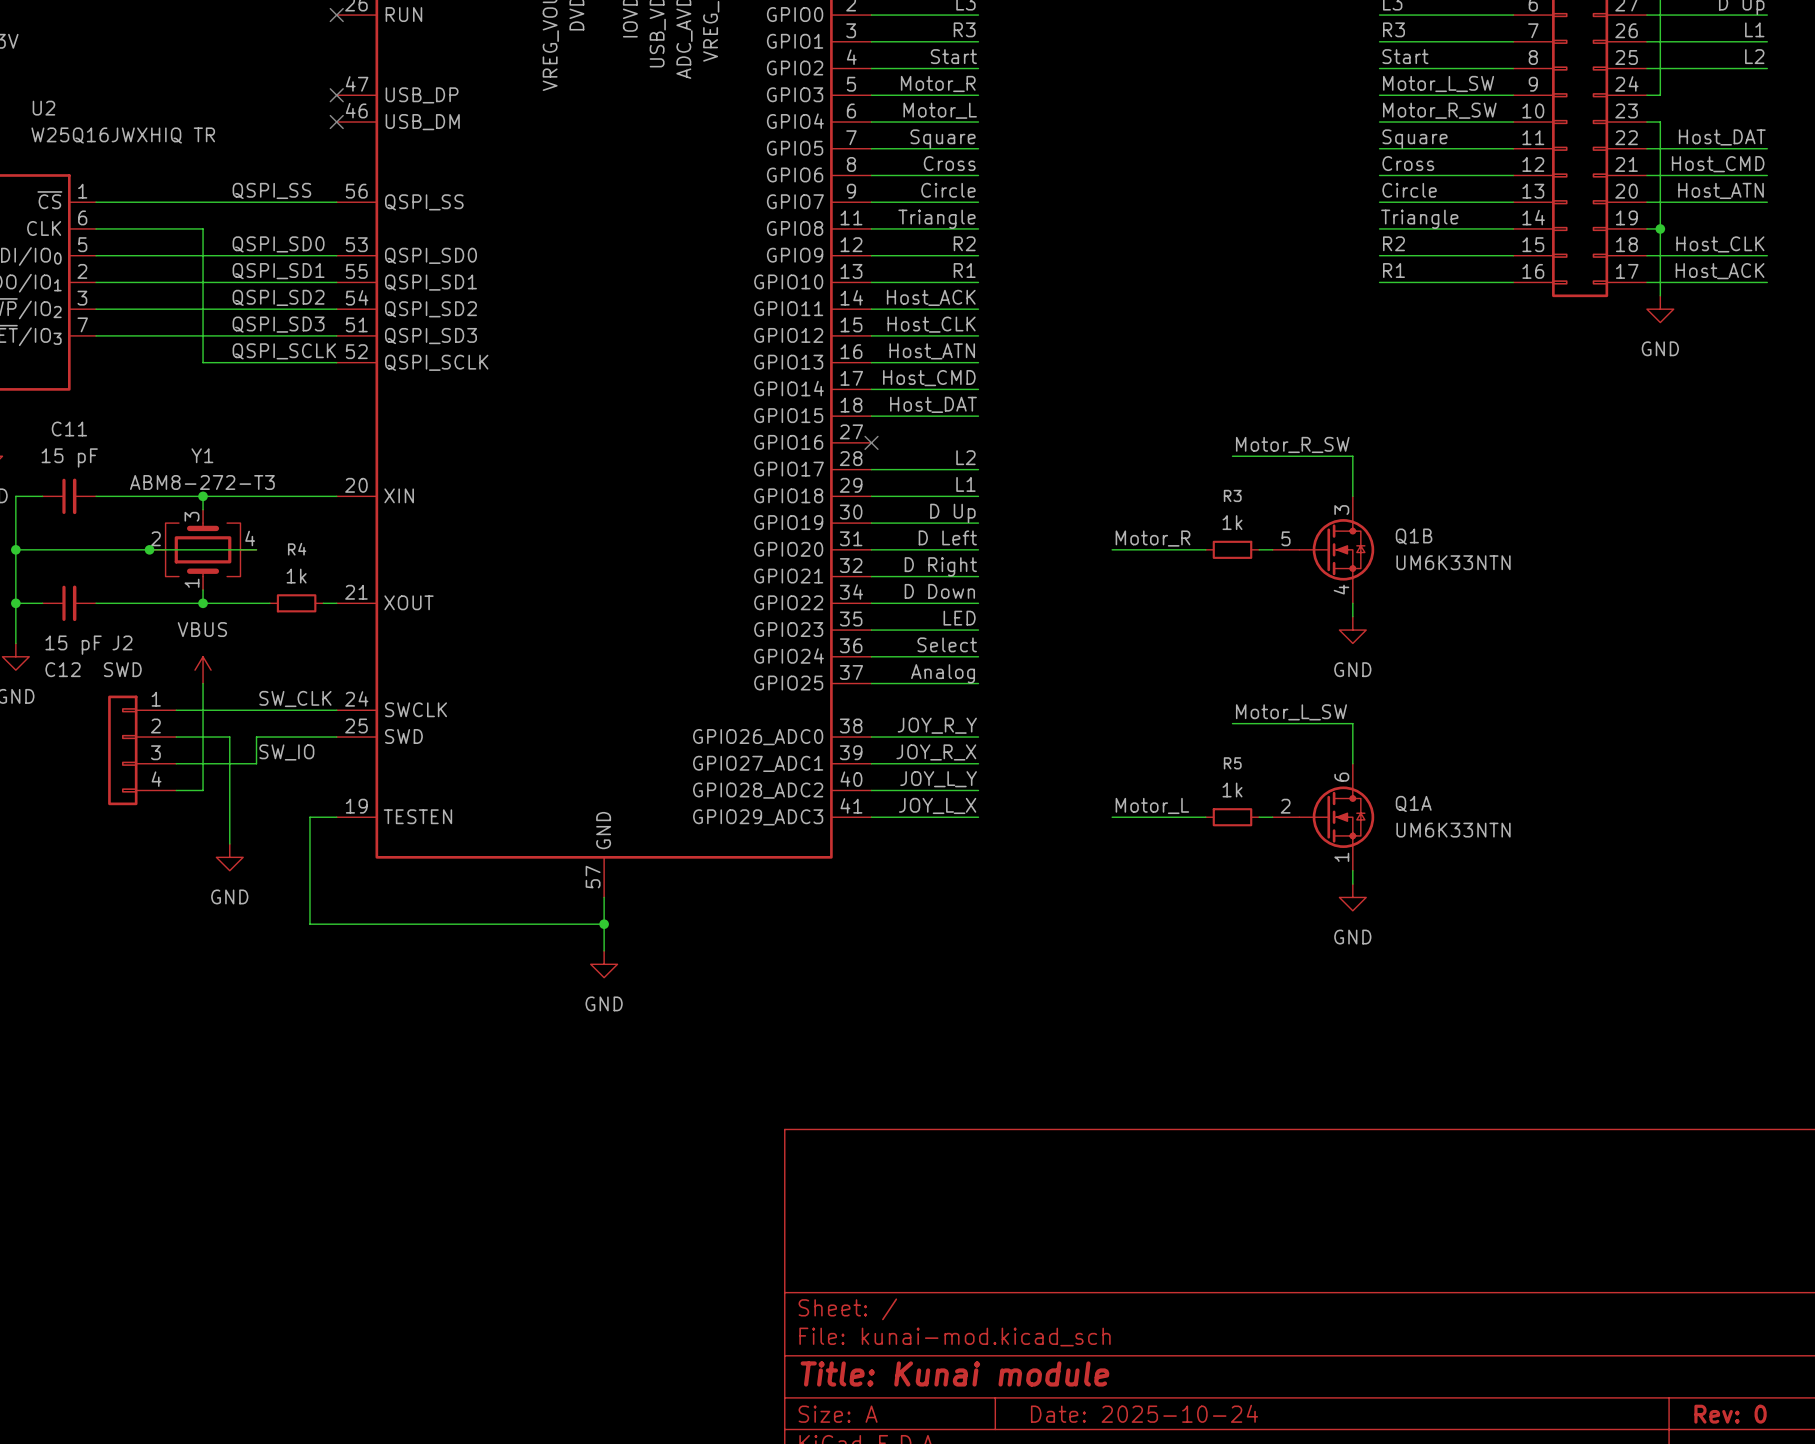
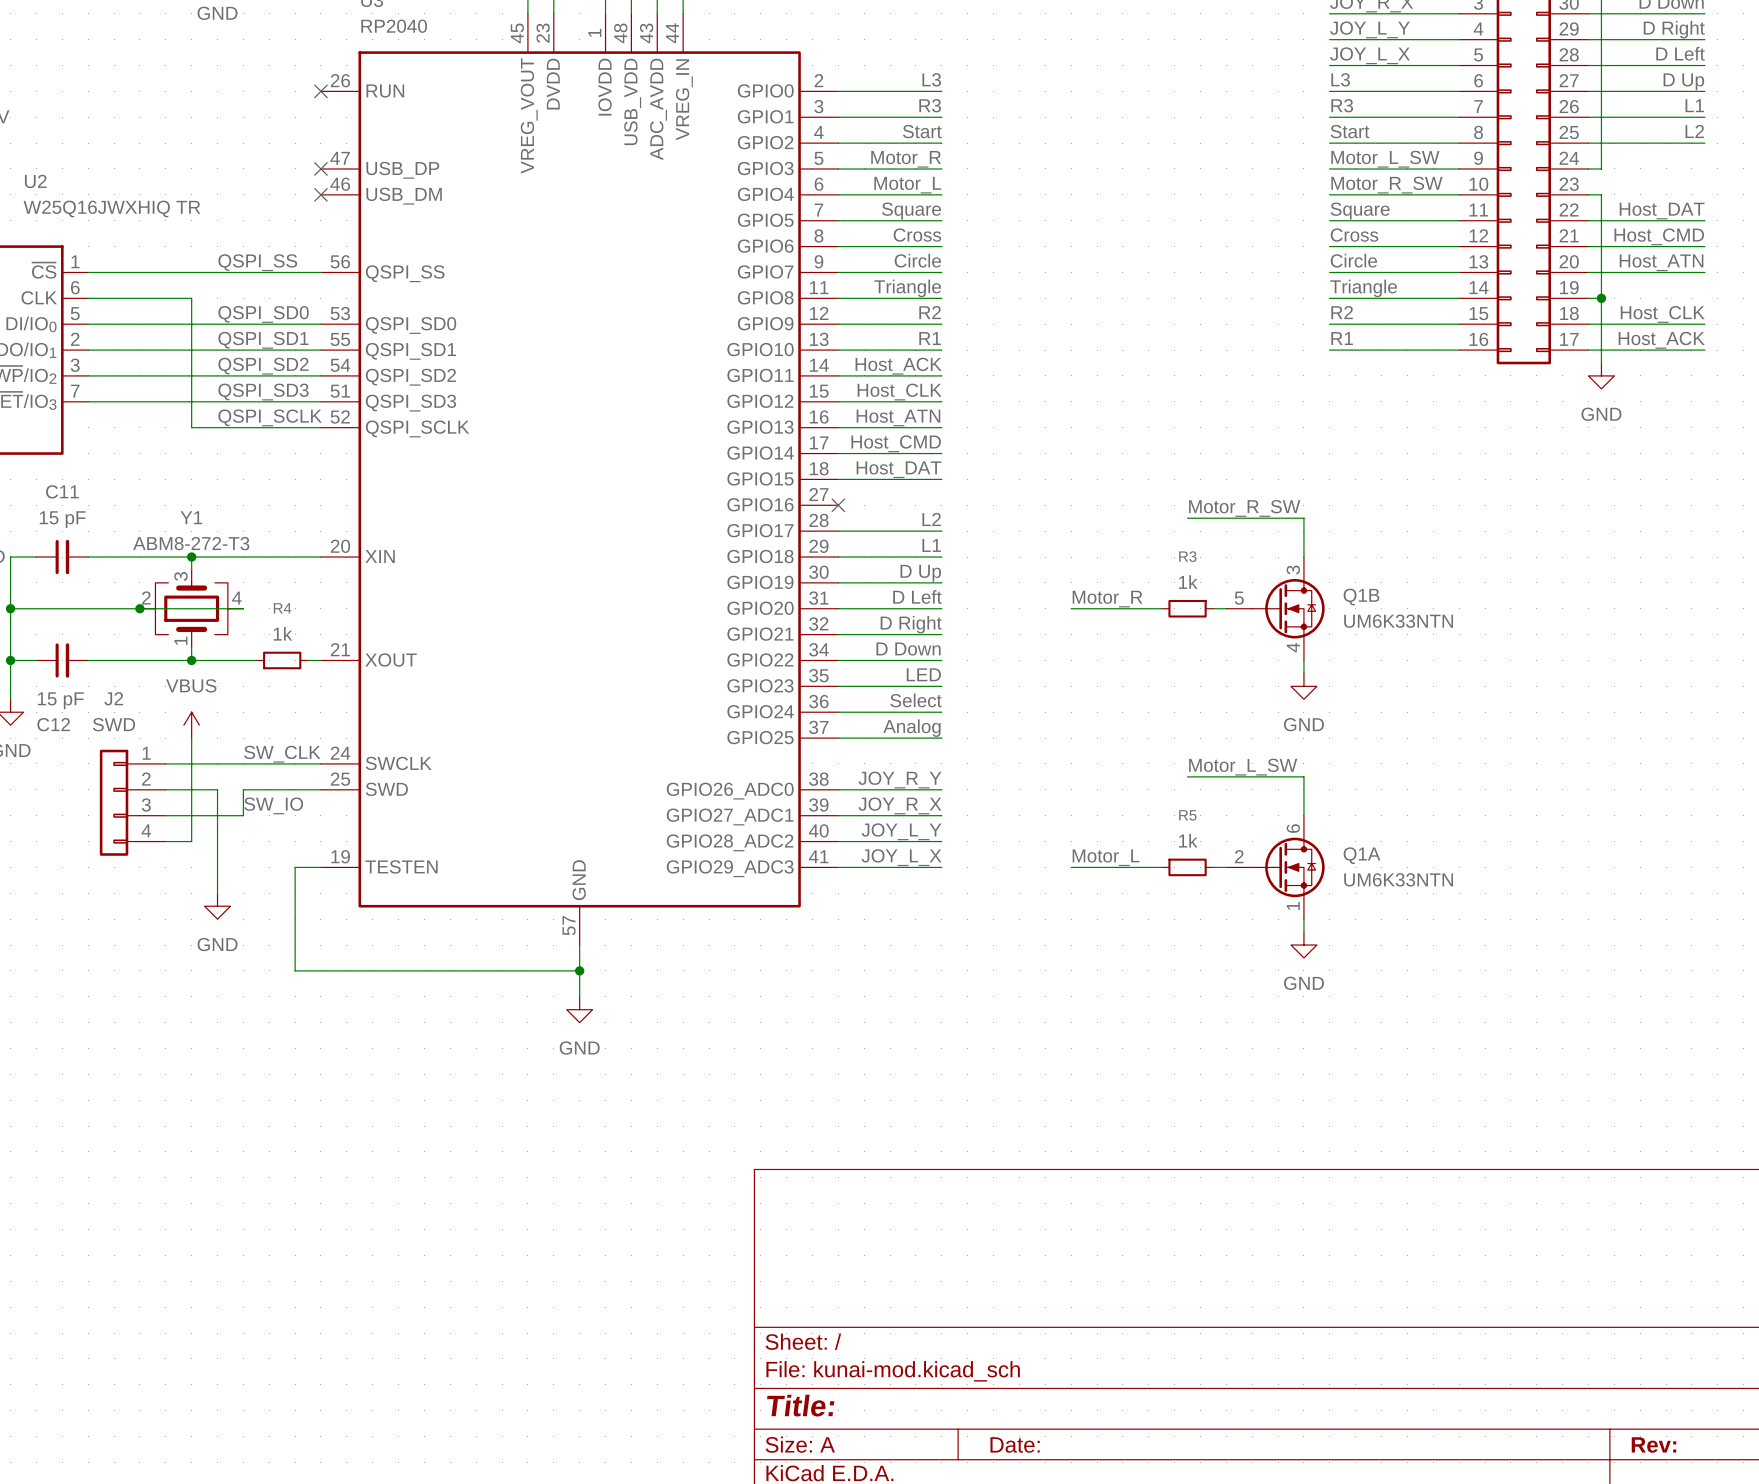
title block: Title: Kunai module (954, 1373) -> Title: (800, 1405)
title block: Date: 2025-10-24 (1144, 1413) -> Date: (1015, 1445)
title block: Rev: 0 (1730, 1414) -> Rev: (1654, 1445)

